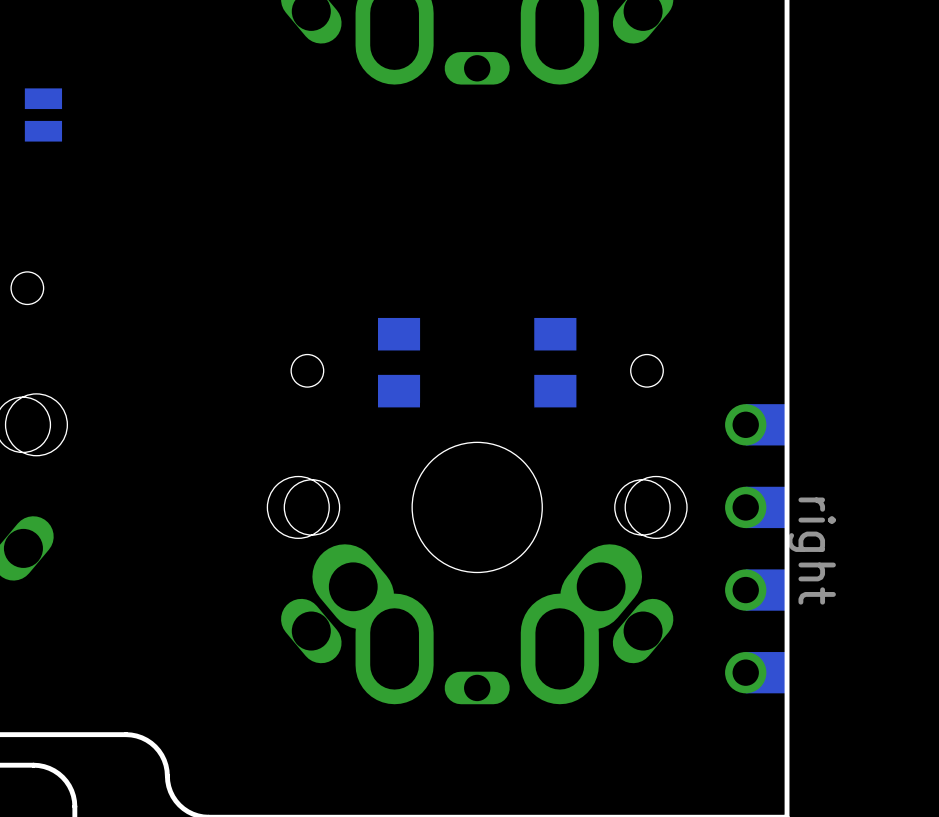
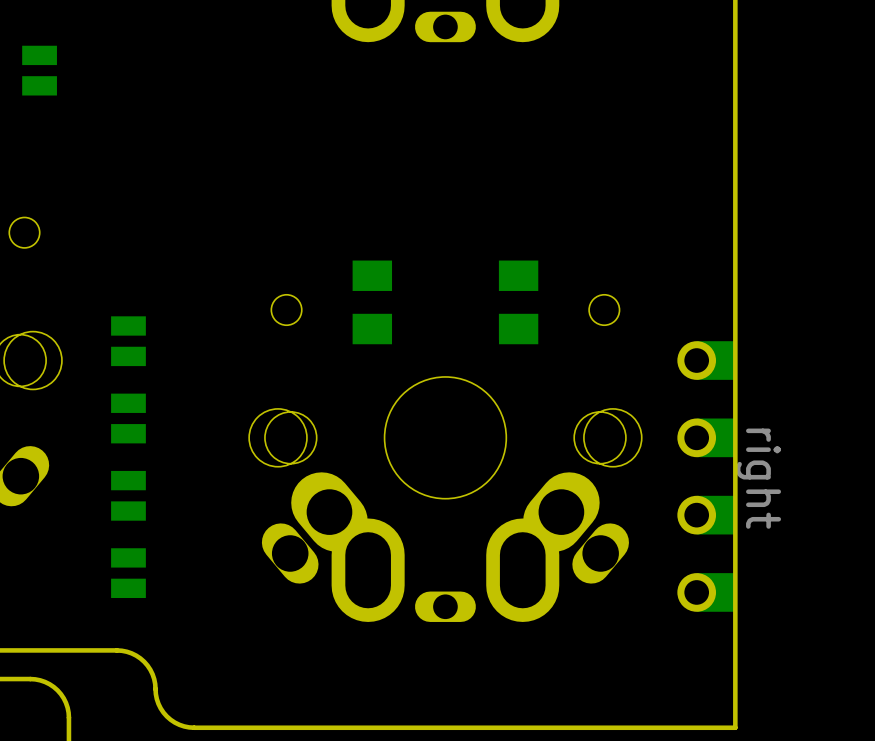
part: none -> (128, 341)
part: none -> (128, 418)
part: none -> (128, 495)
part: none -> (128, 573)

